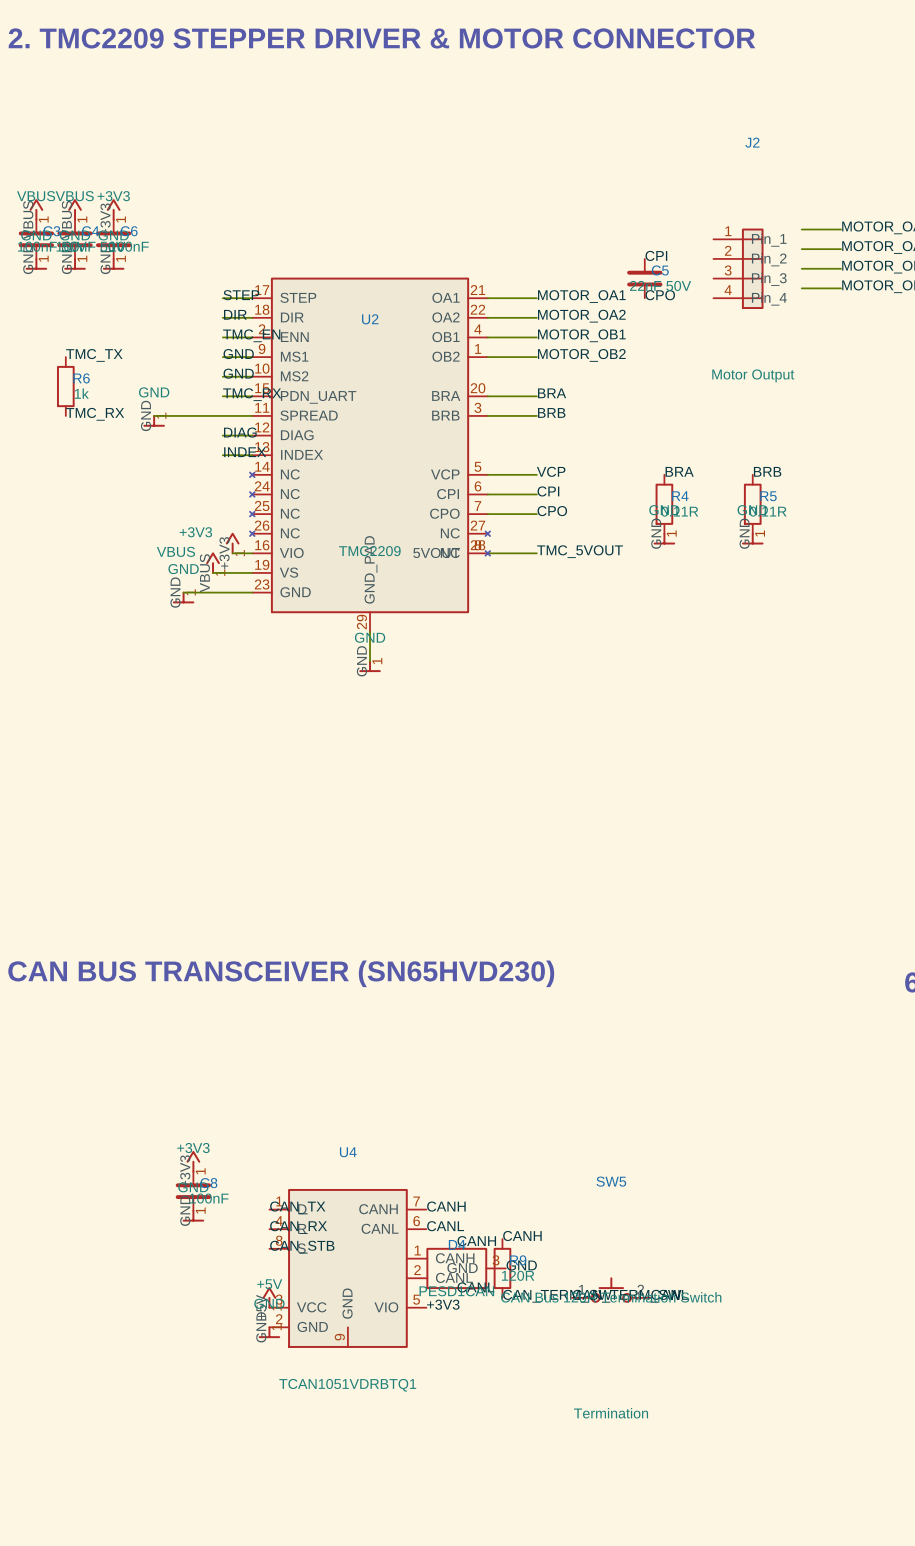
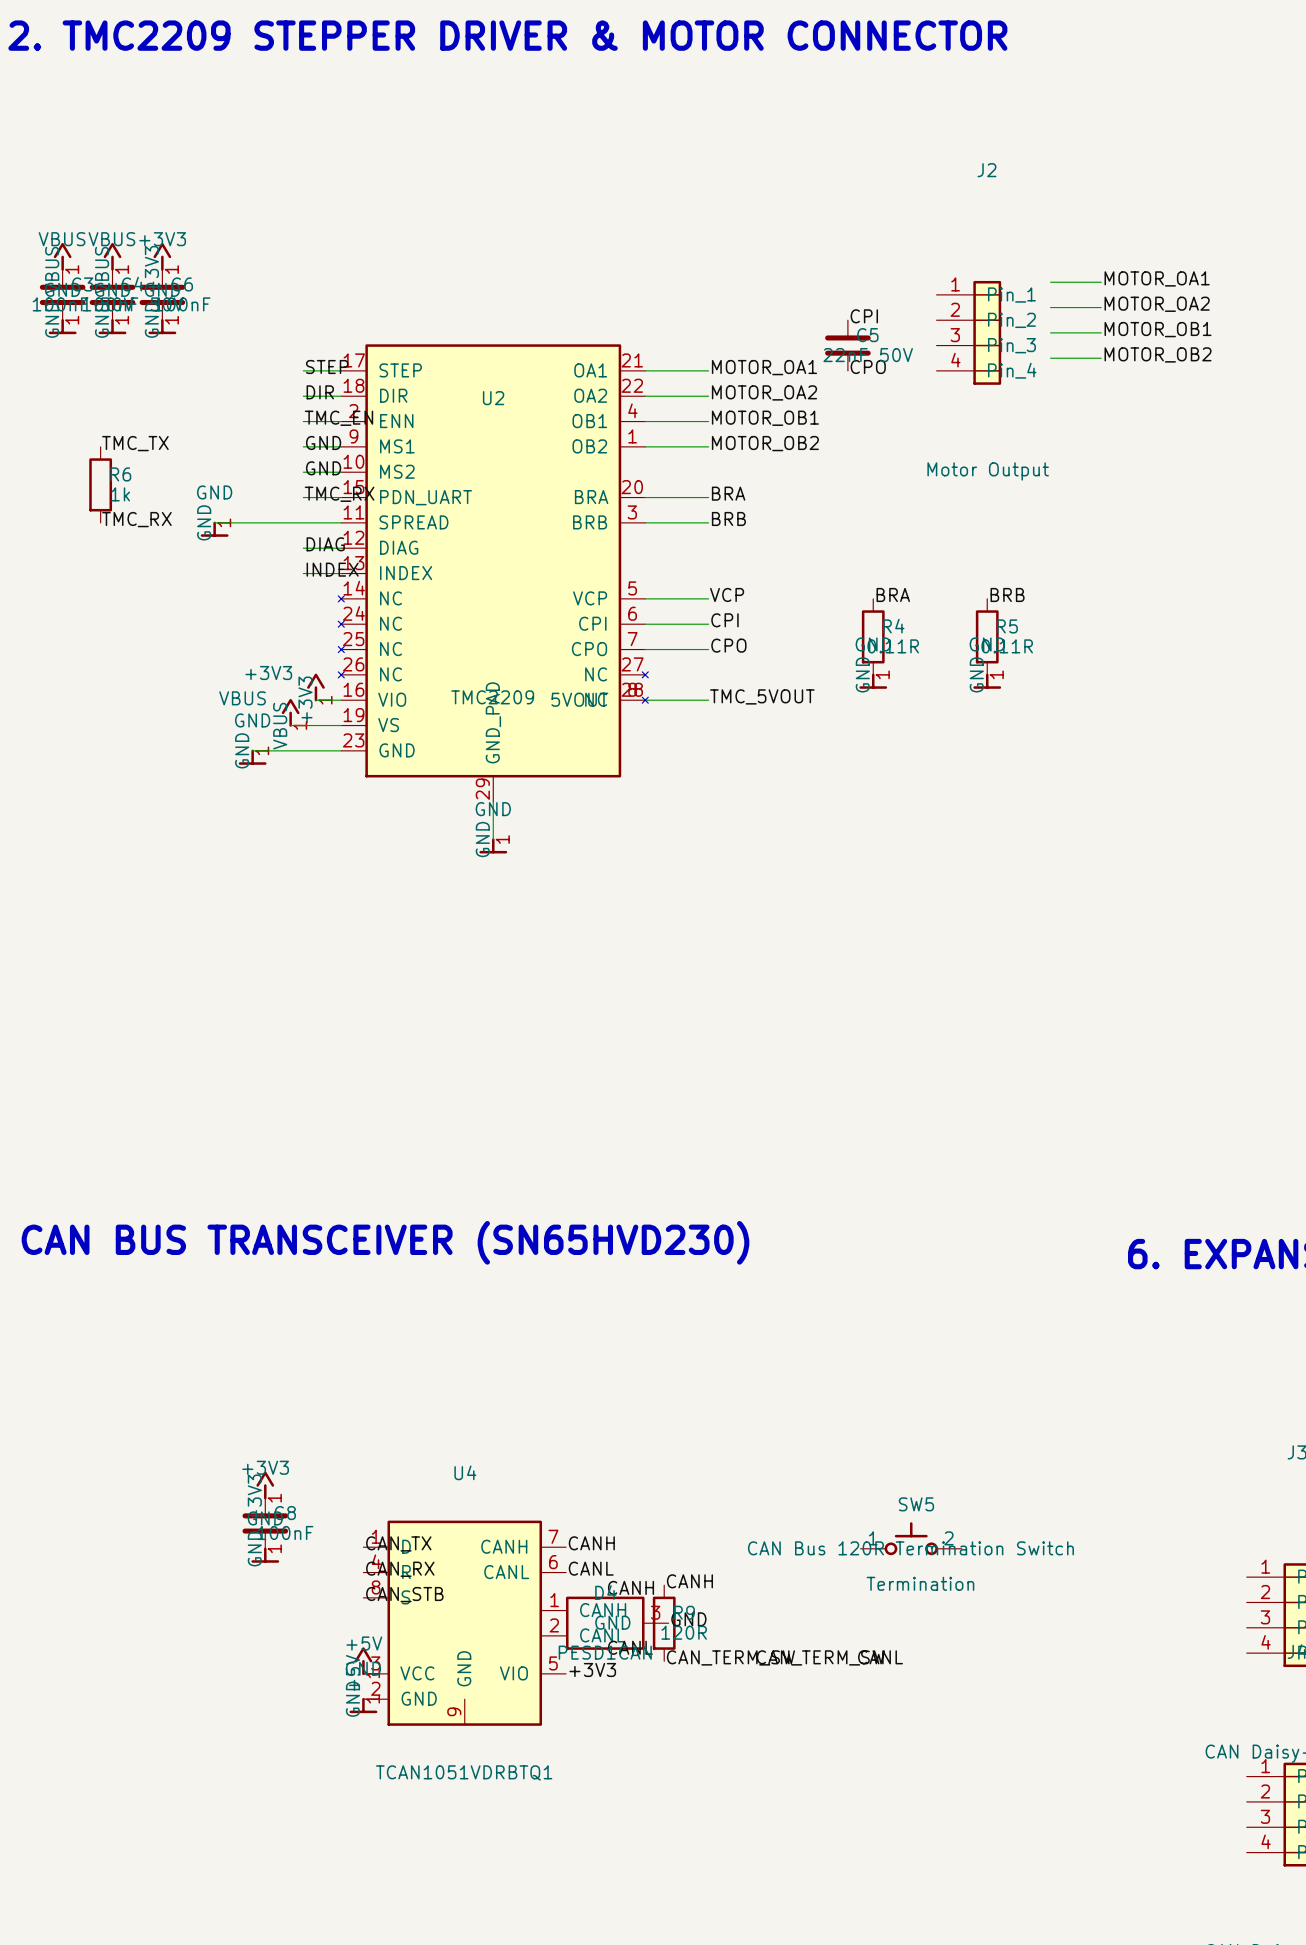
SW5 name position: SW5 (611, 1181) -> SW5 (916, 1504)
SW5 position: (611, 1290) -> (911, 1538)
SW5 value position: Termination (611, 1413) -> Termination (920, 1583)

